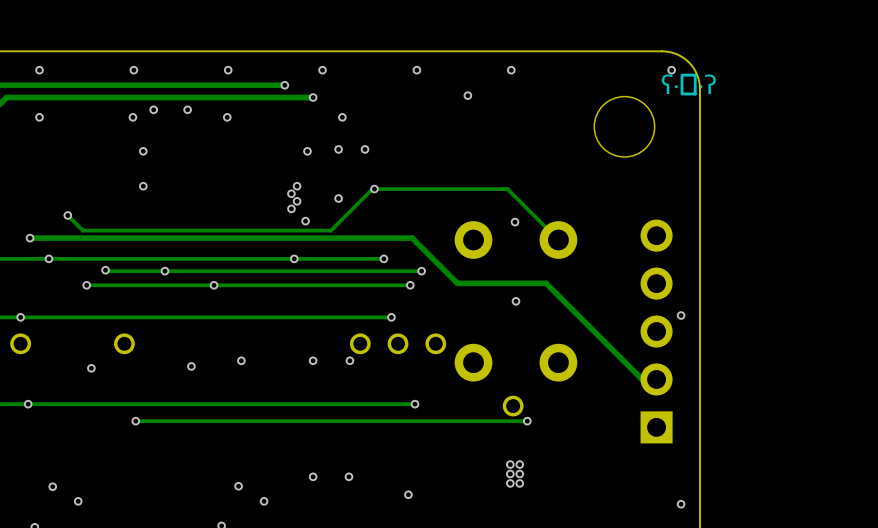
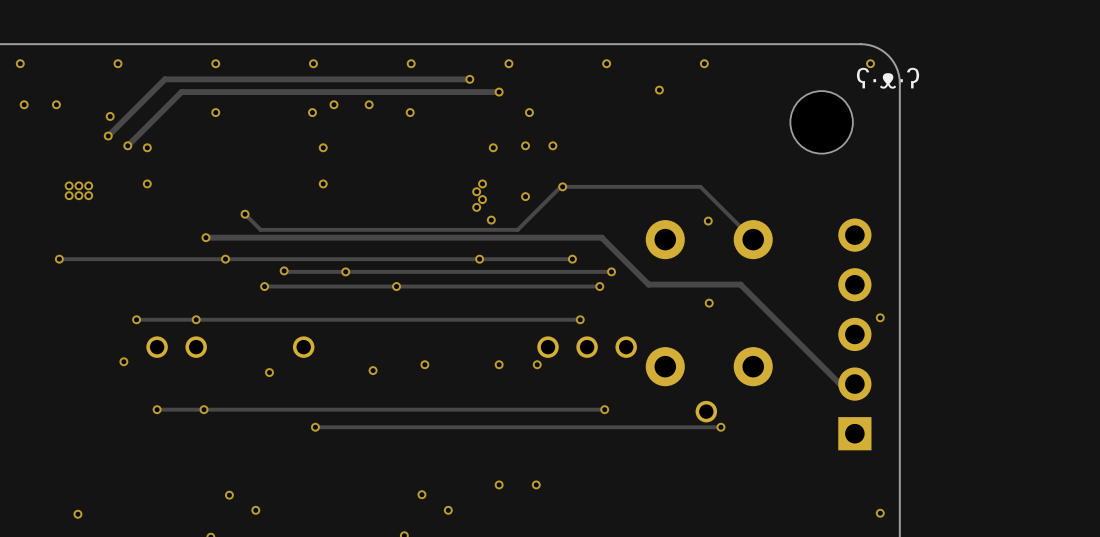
via: (510, 464) -> none
via: (519, 464) -> none
via: (510, 473) -> none
via: (519, 473) -> none
via: (510, 483) -> none
via: (519, 483) -> none
via: (408, 494) -> none

